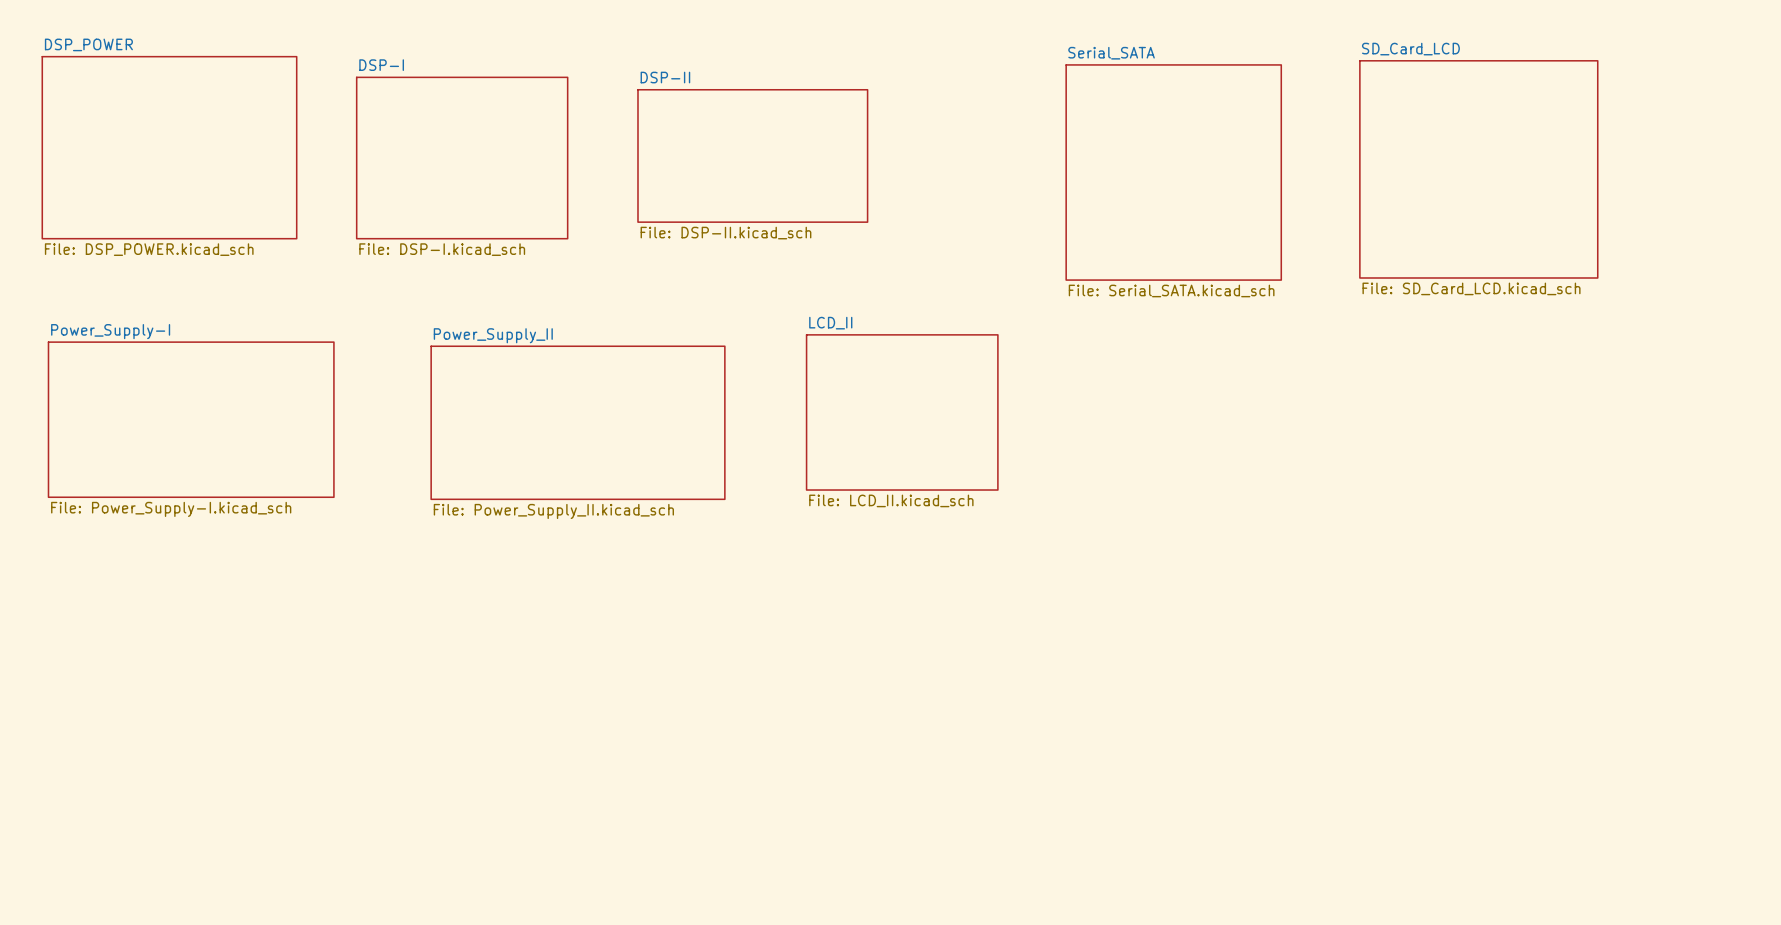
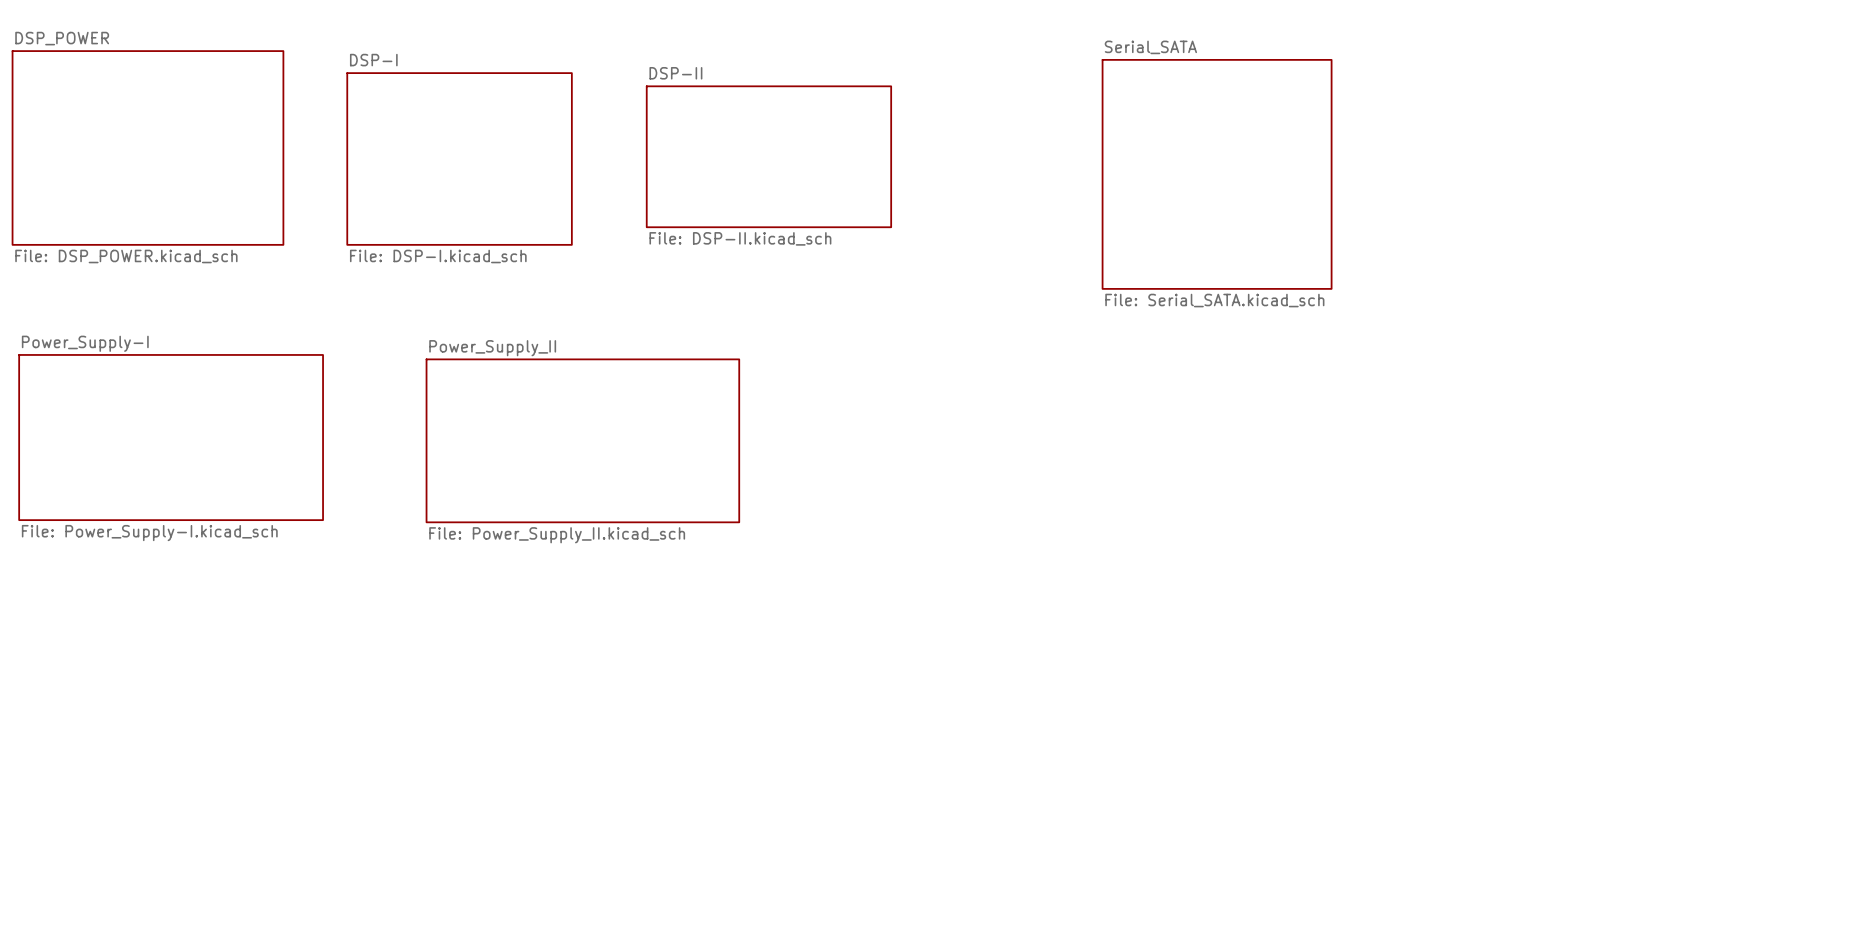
sheet SD_Card_LCD: File: SD_Card_LCD.kicad_sch (1478, 169) -> none
sheet LCD_II: File: LCD_II.kicad_sch (902, 412) -> none

